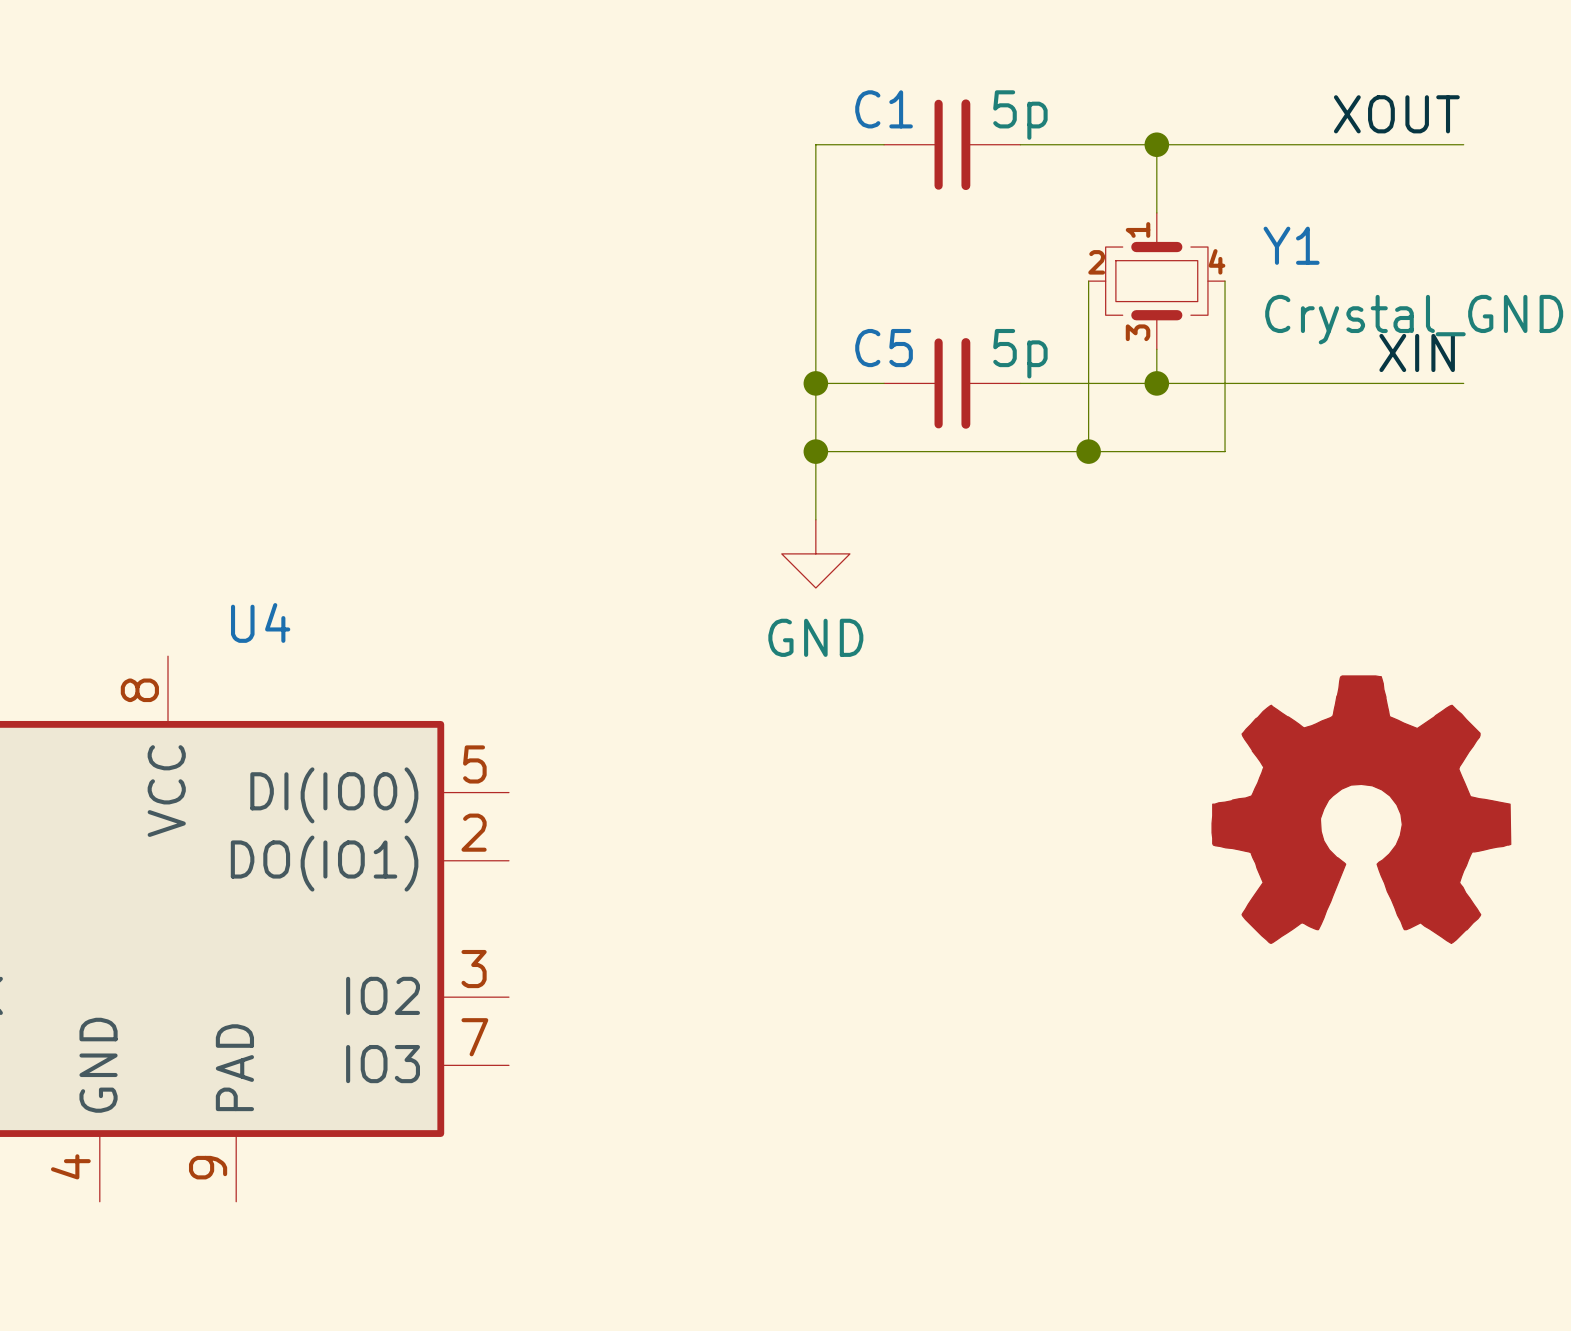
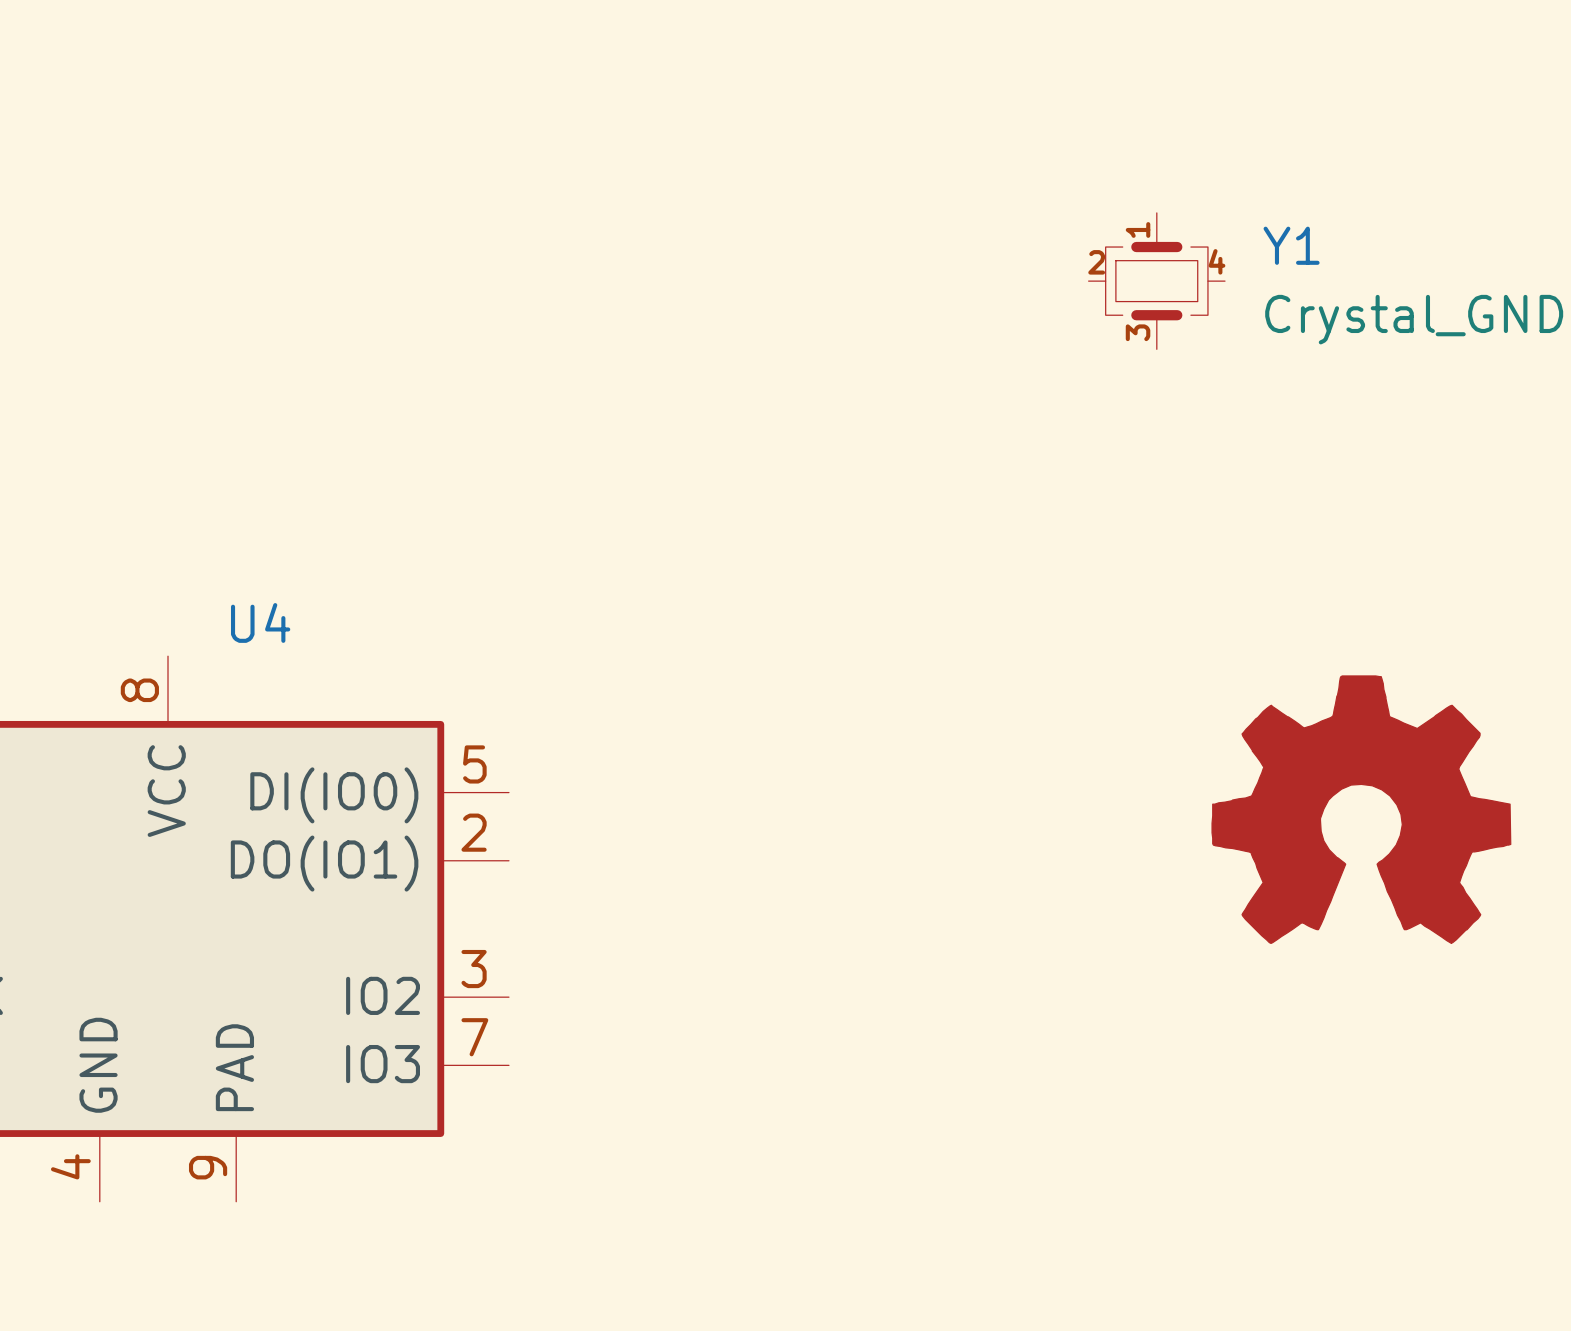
label: XOUT (1396, 114) -> none
wire: (884, 144) (815, 144) (815, 519) -> none
C1: 5p (952, 144) -> none
wire: (1020, 144) (1463, 144) -> none
wire: (1156, 144) (1156, 212) -> none
junction: (1156, 144) -> none
wire: (1088, 281) (1088, 451) -> none
wire: (1225, 281) (1225, 451) (815, 451) -> none
wire: (1156, 349) (1156, 383) -> none
label: XIN (1417, 352) -> none
wire: (815, 383) (884, 383) -> none
junction: (815, 383) -> none
C5: 5p (952, 383) -> none
wire: (1020, 383) (1463, 383) -> none
junction: (1156, 383) -> none
junction: (815, 451) -> none
junction: (1088, 451) -> none
power symbol: GND (815, 553) -> none

